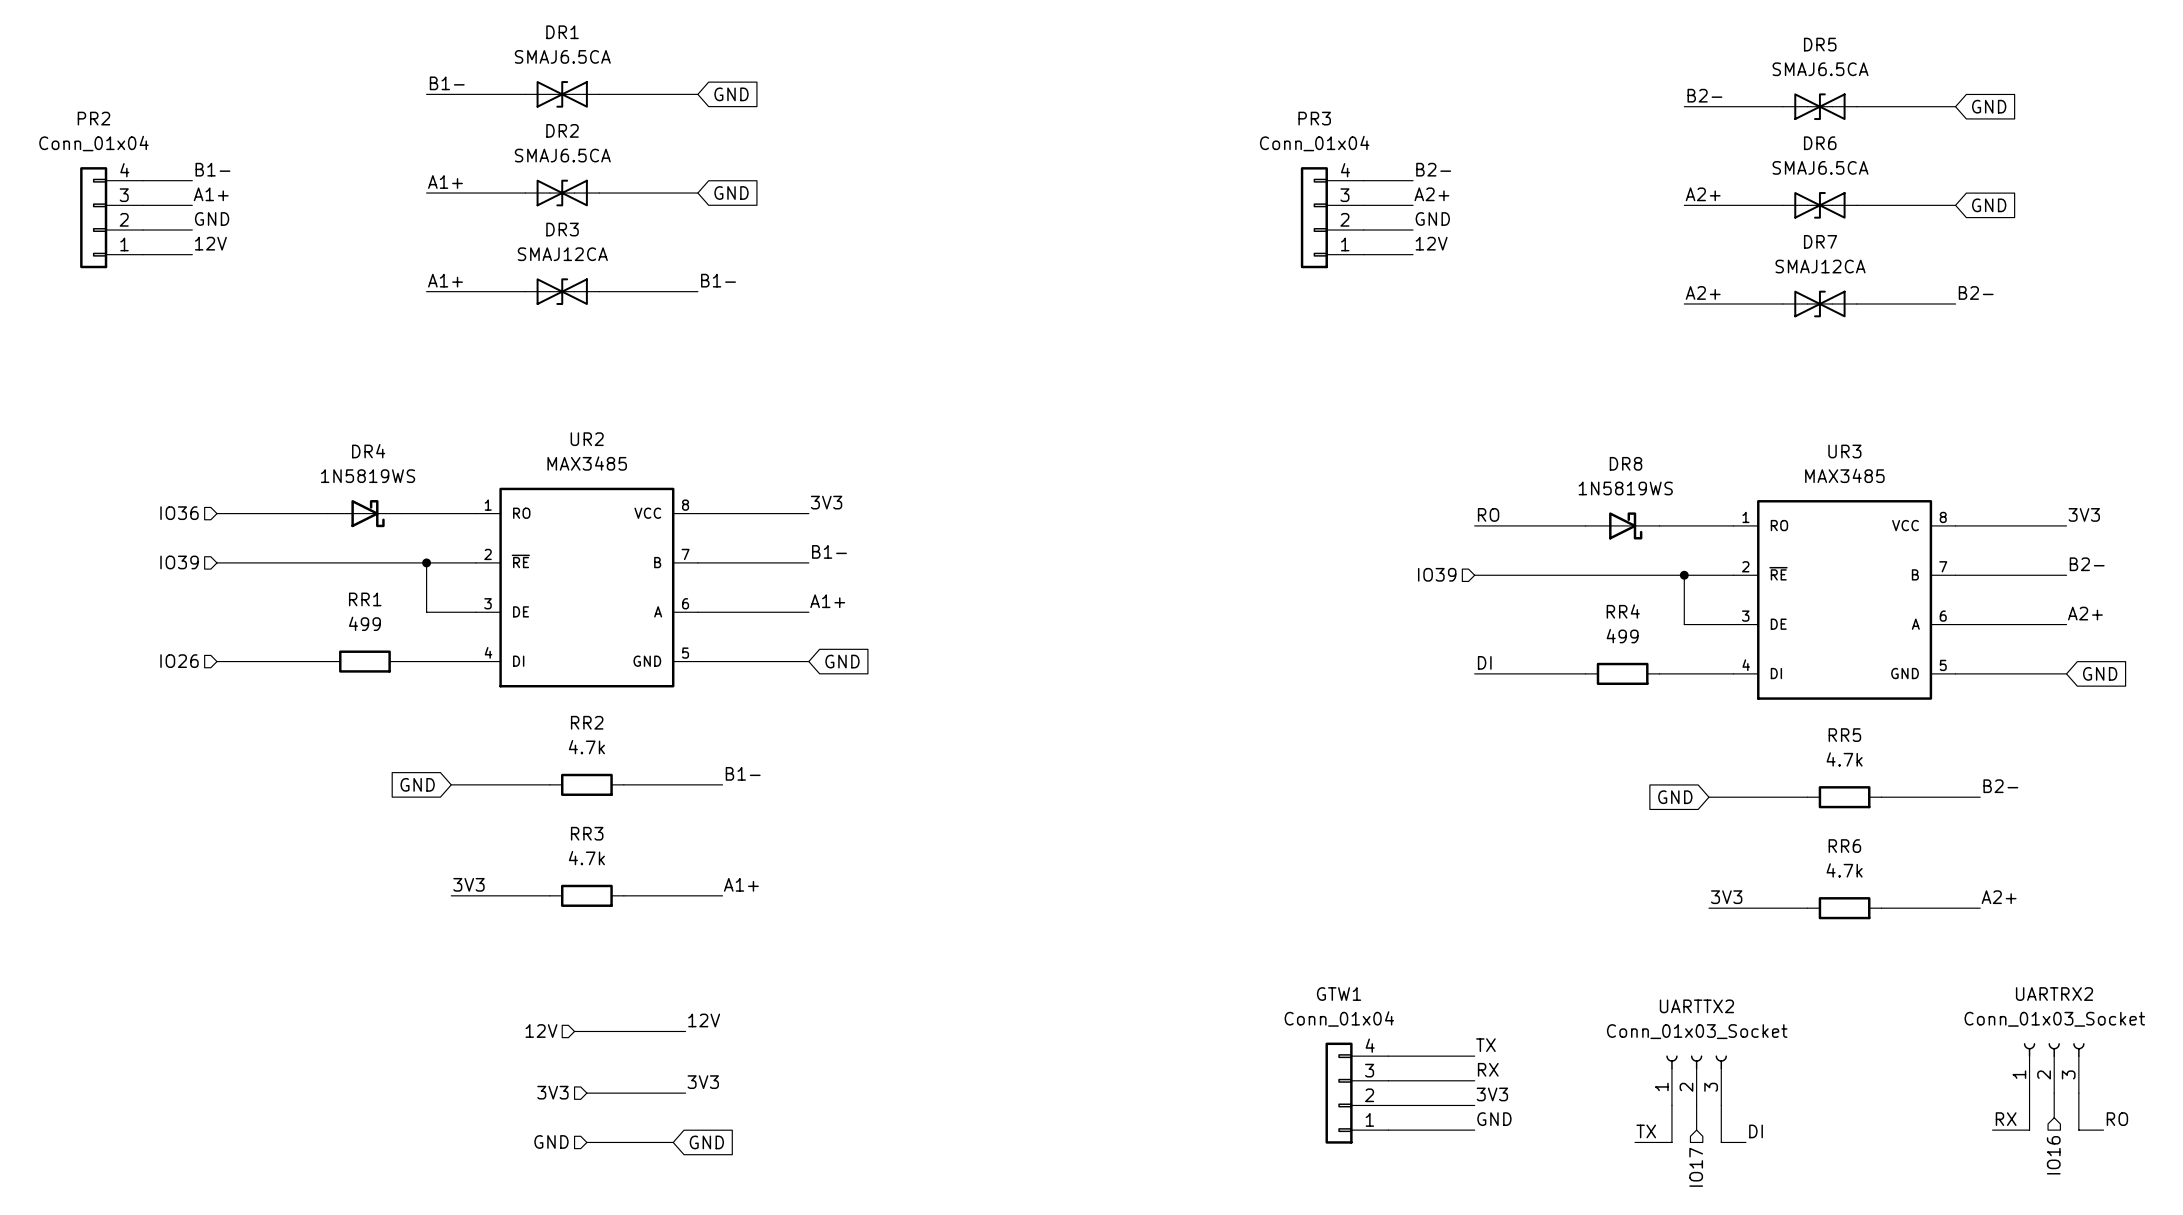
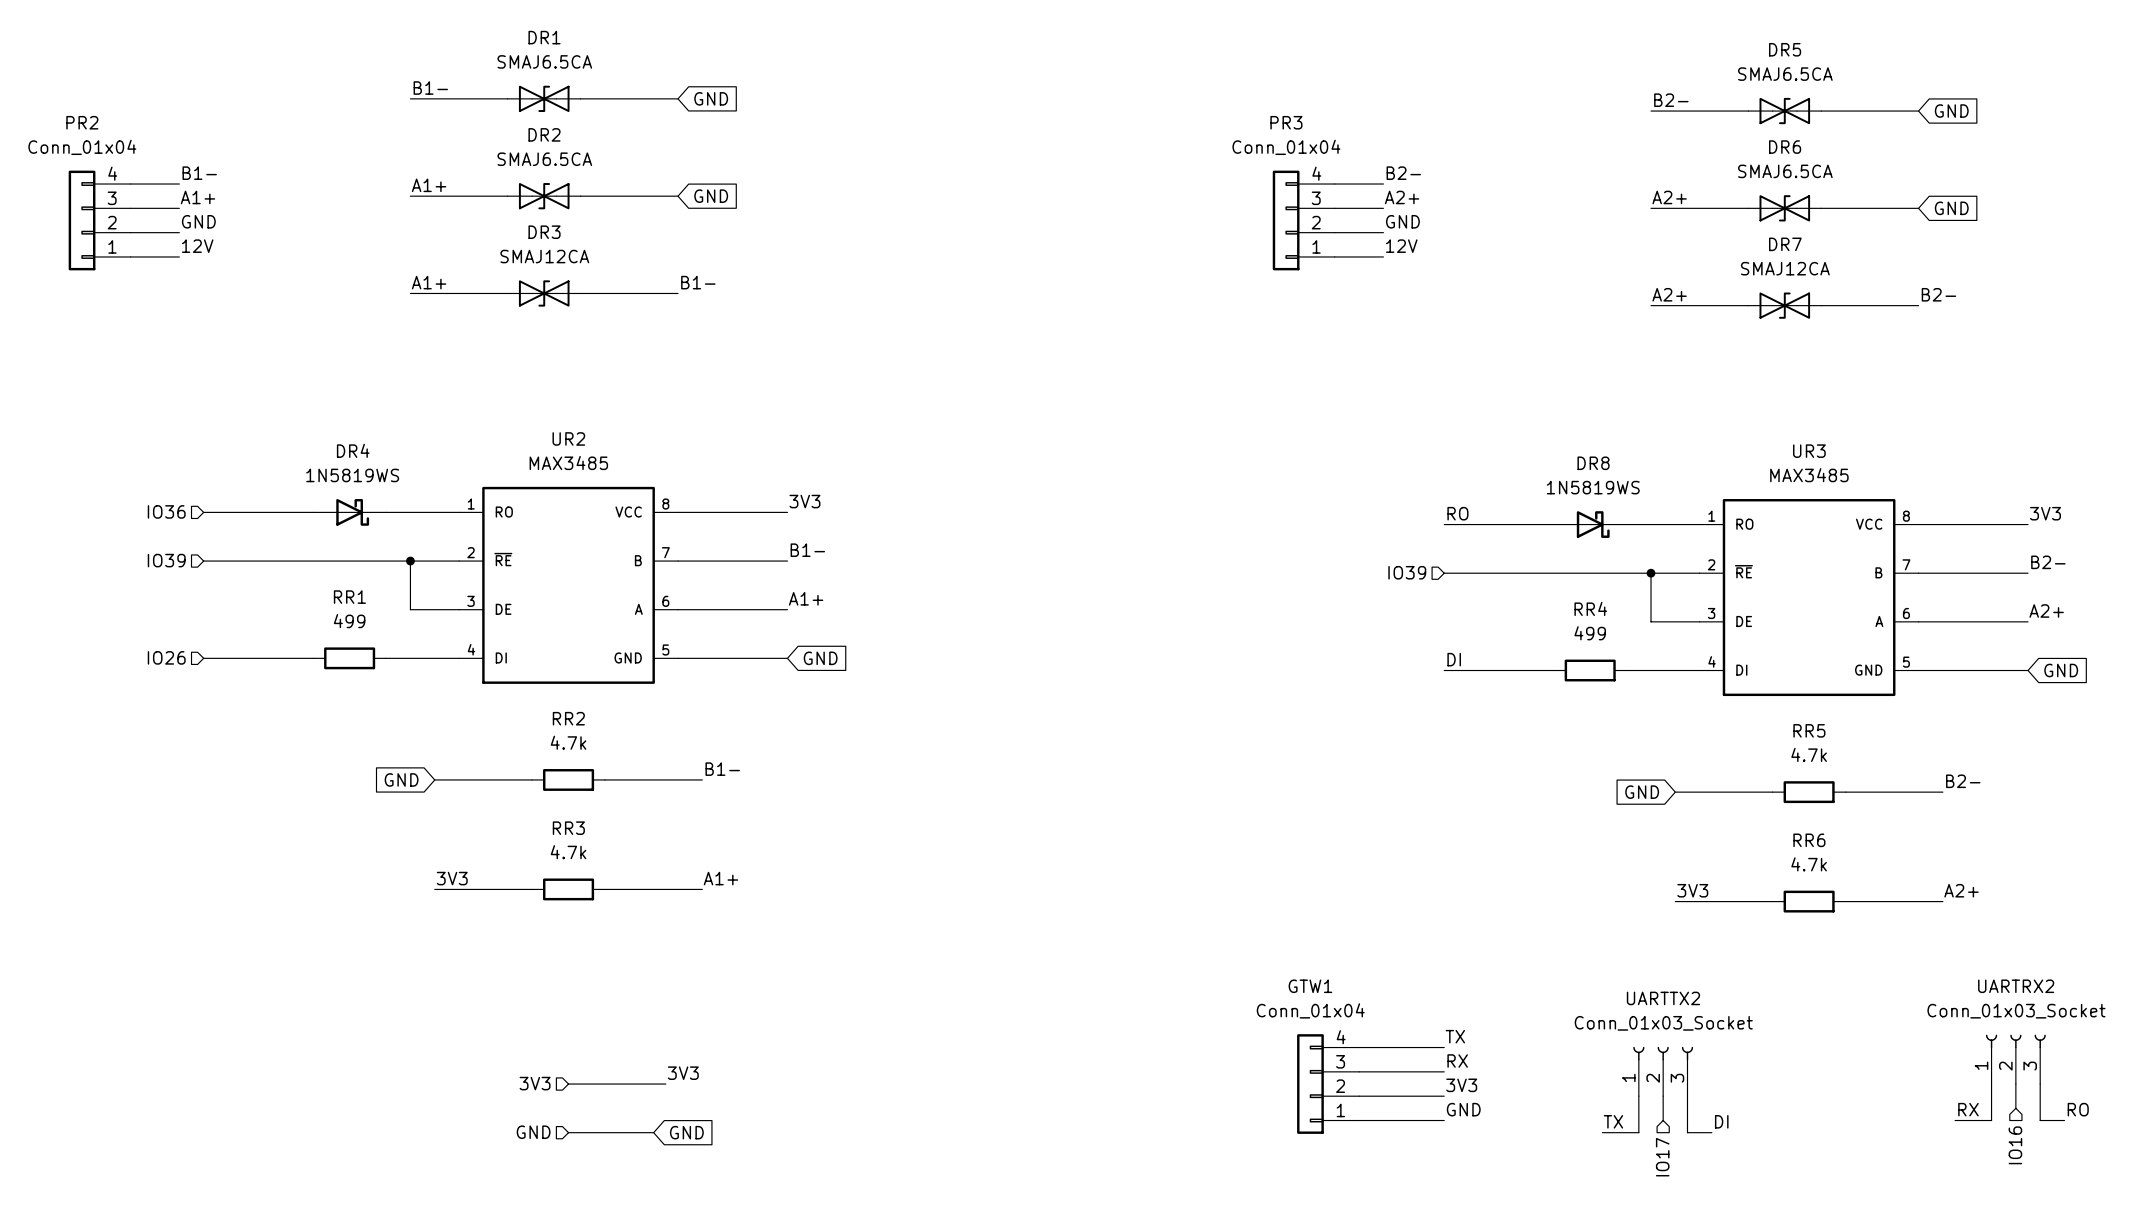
label: 12V (704, 1020) -> none
hierarchical label: 12V (541, 1031) -> none
wire: (574, 1031) (685, 1031) -> none

